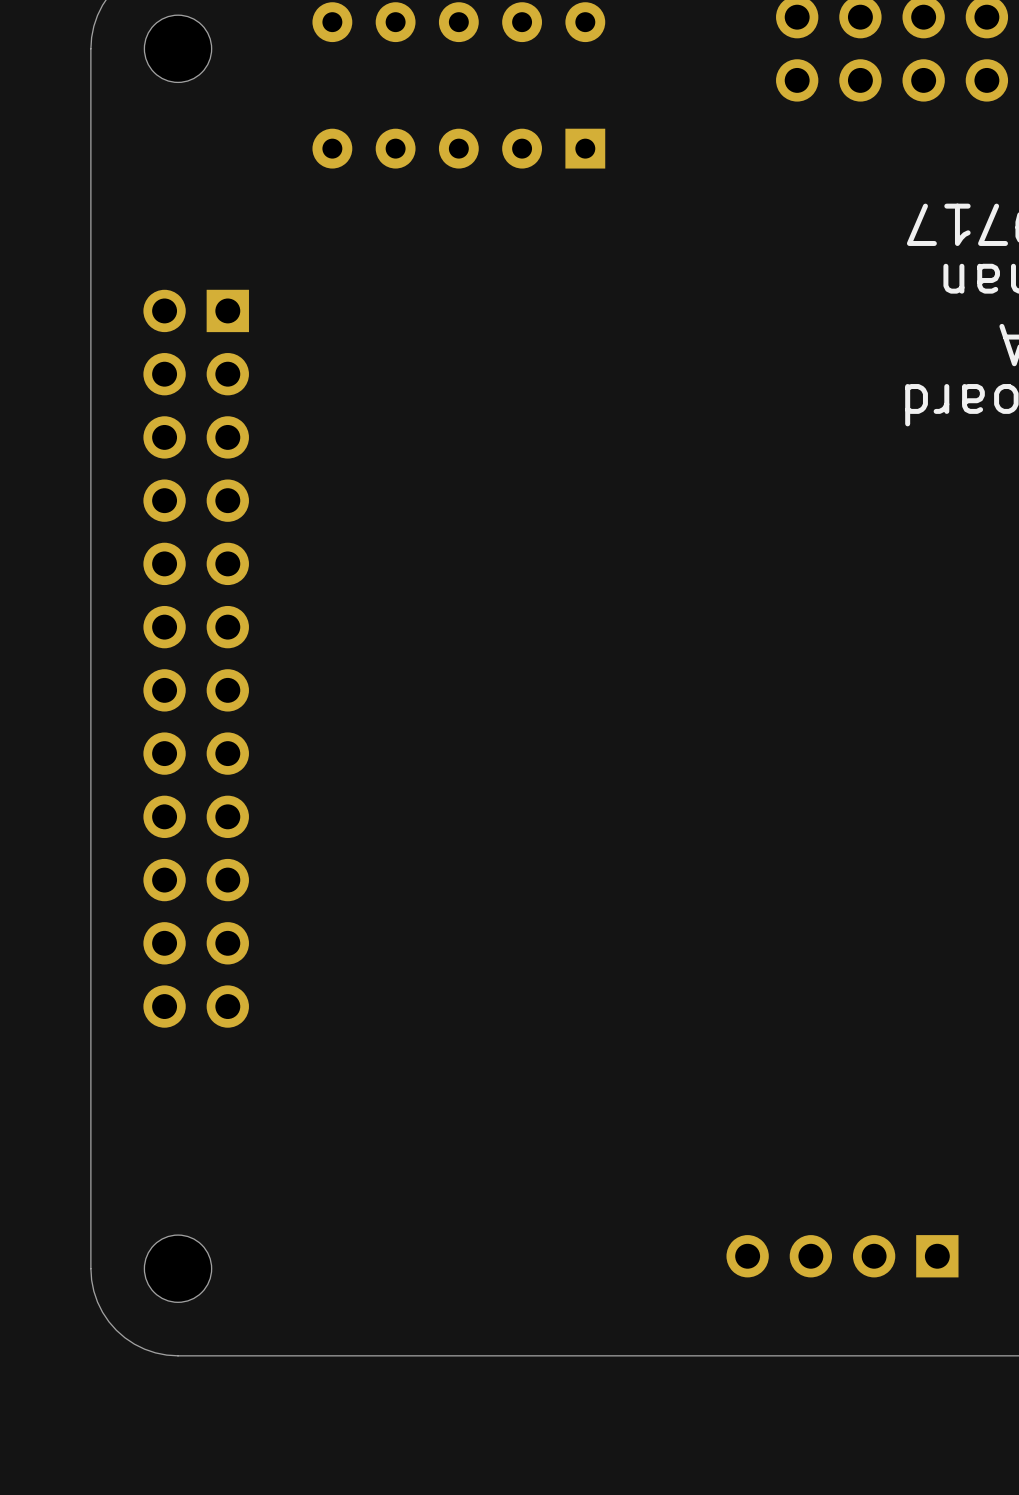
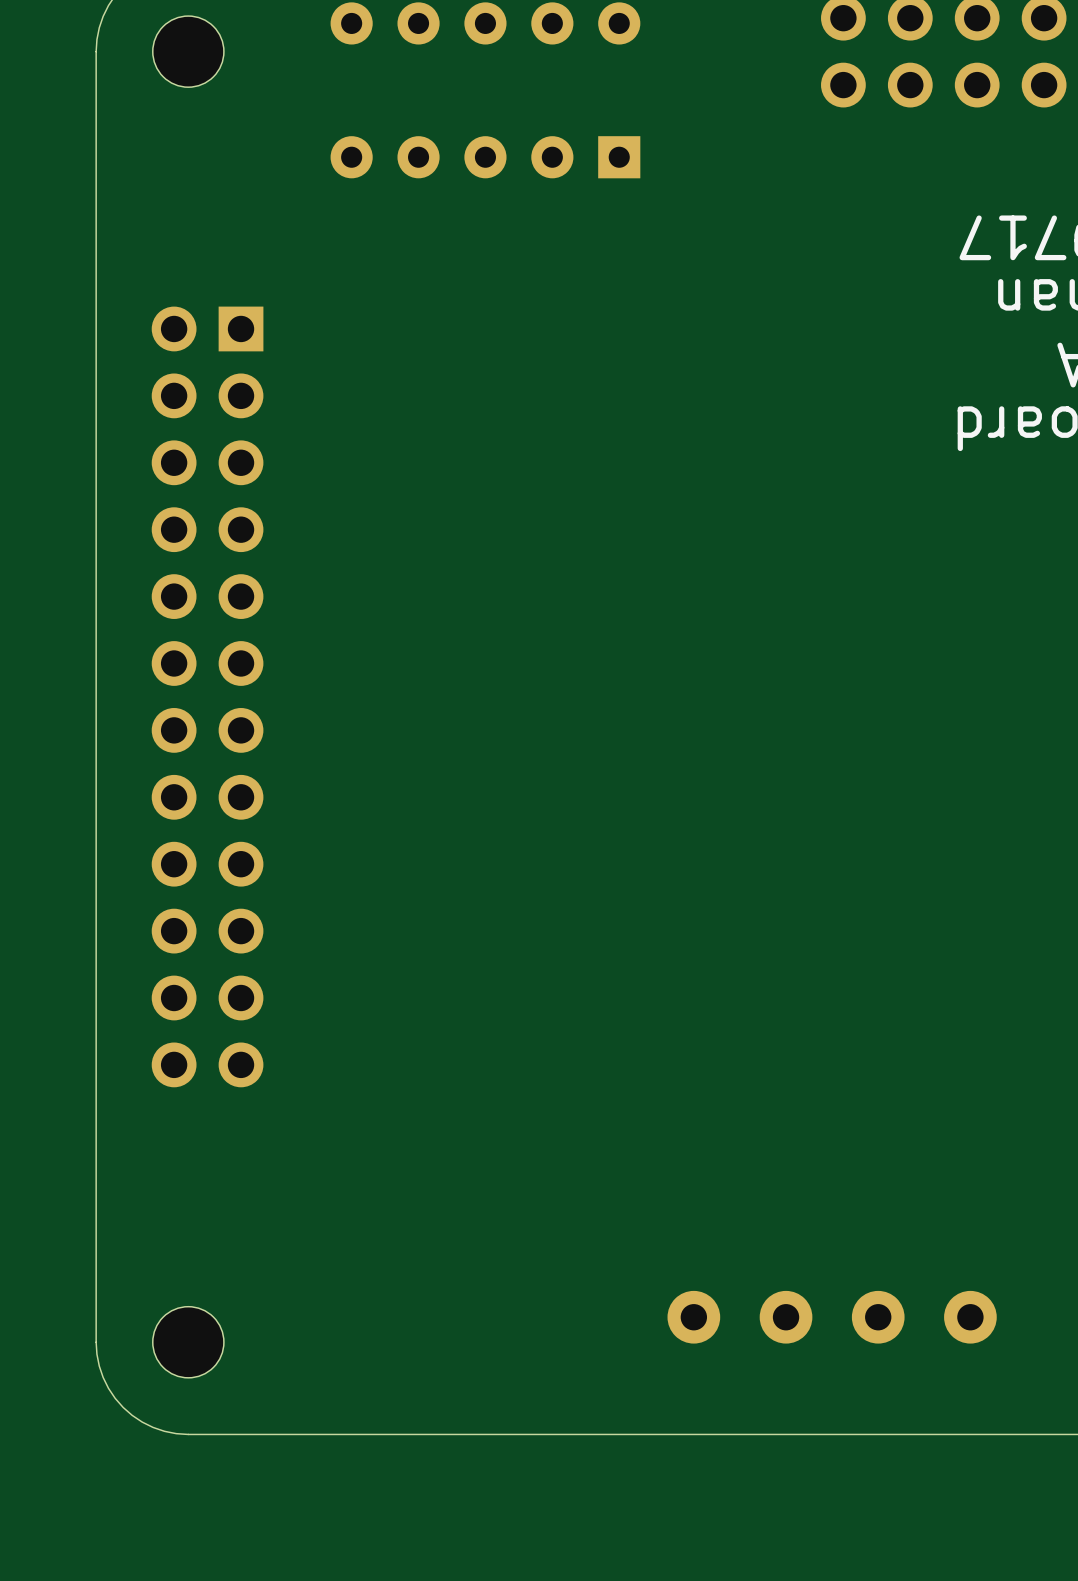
part: none -> (832, 1317)
part: (842, 1256) -> none

